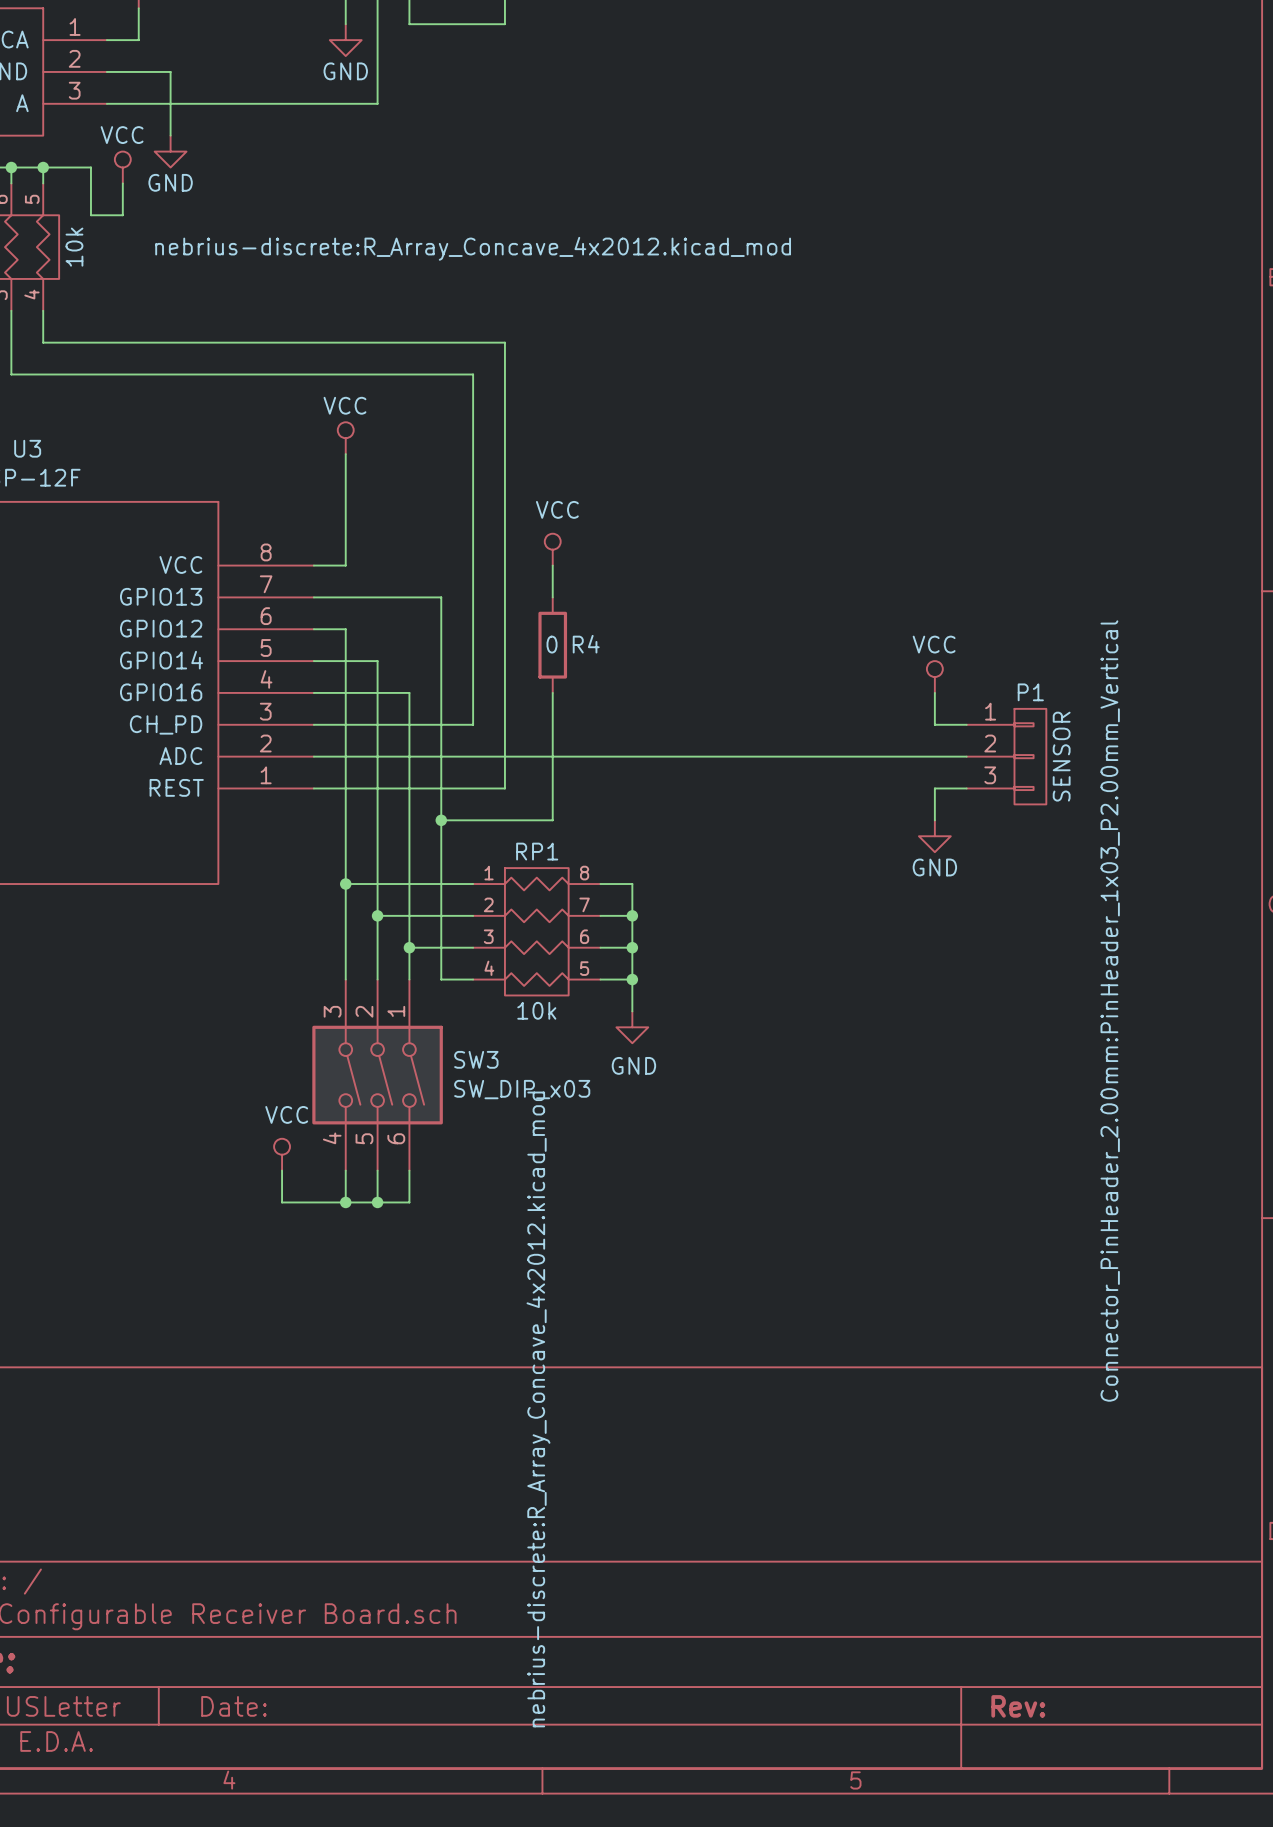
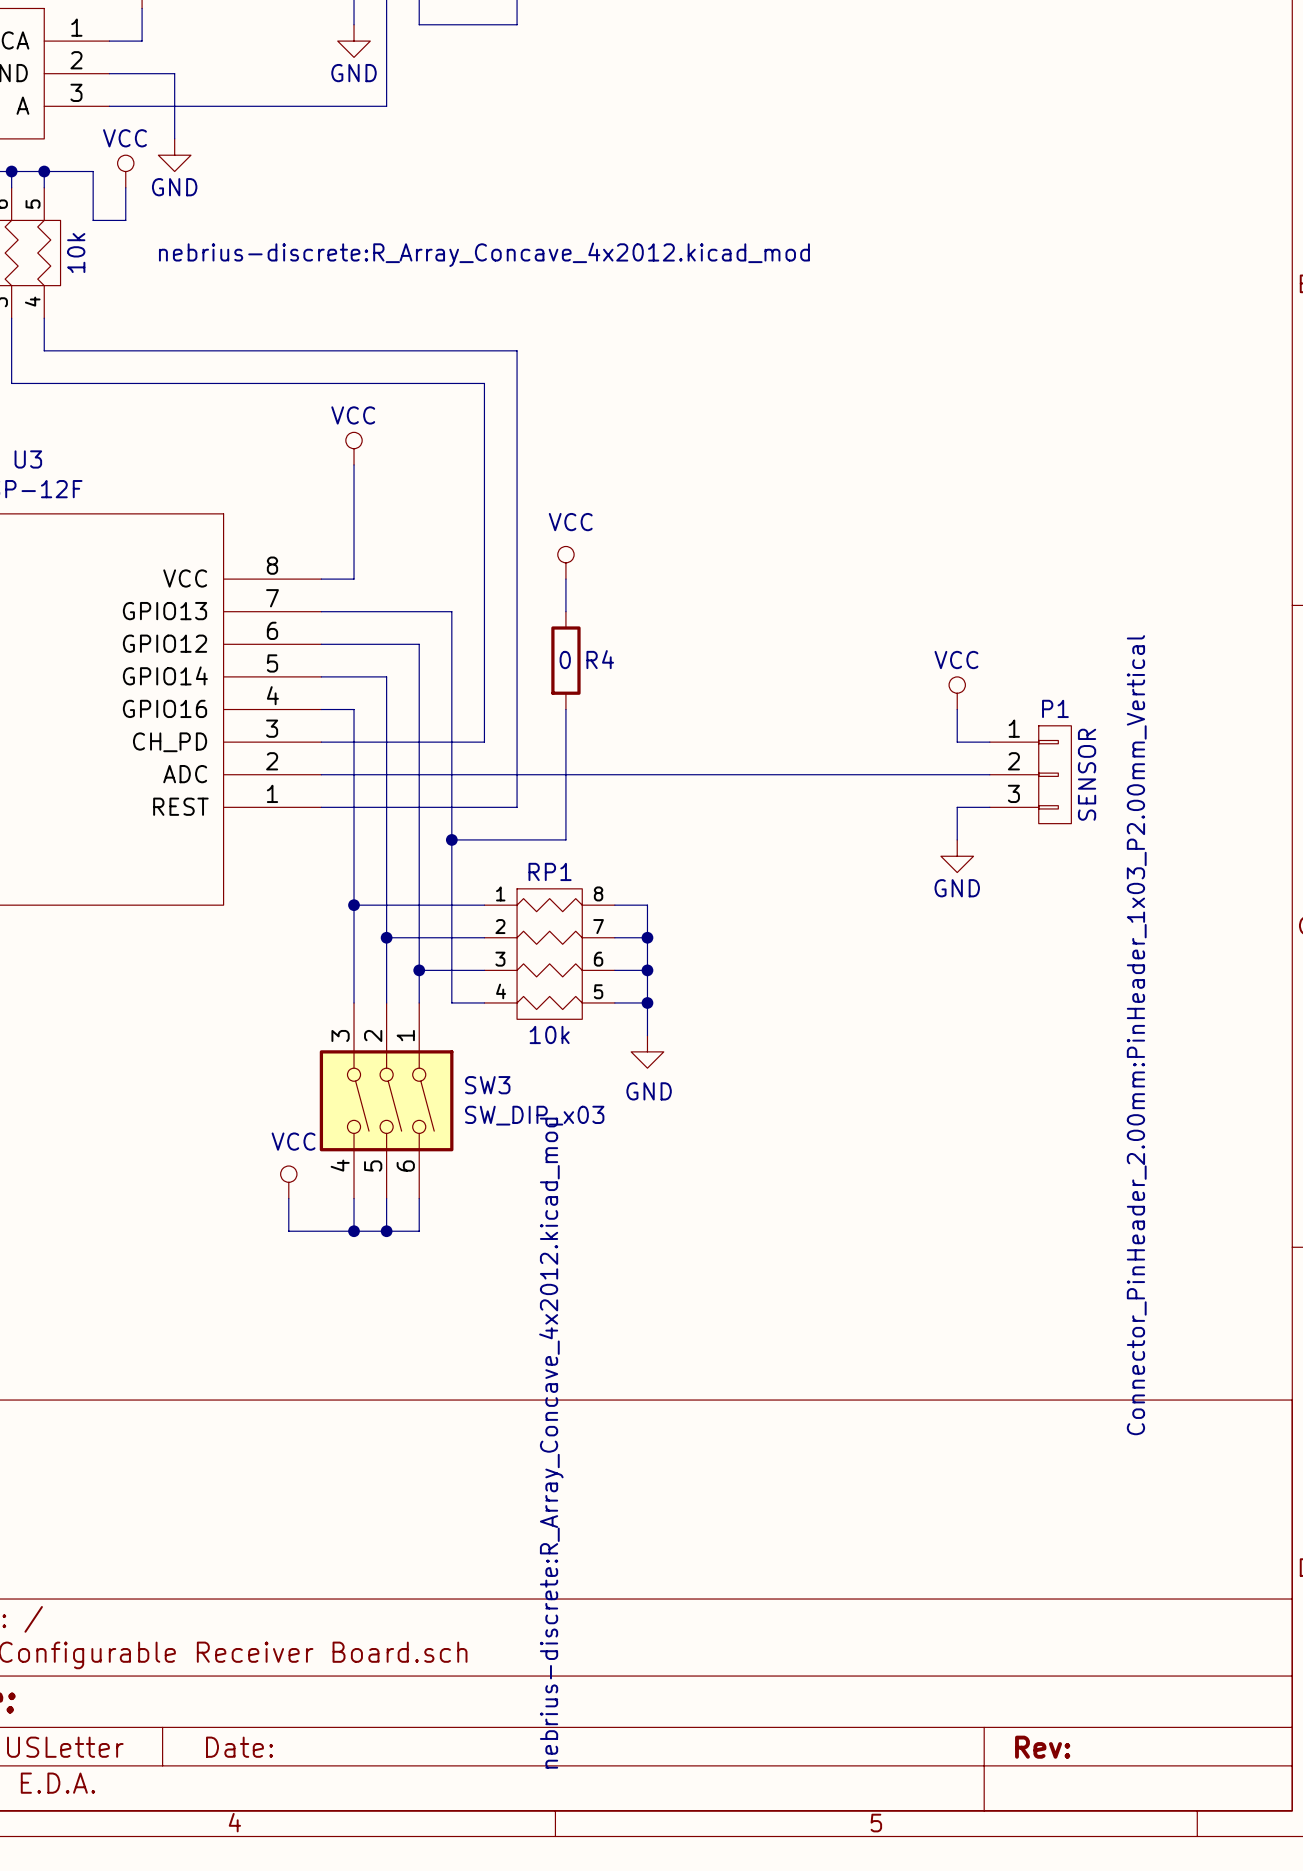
wire: (345, 629) (345, 692) (409, 692) -> (354, 644) (419, 644) (419, 709)

